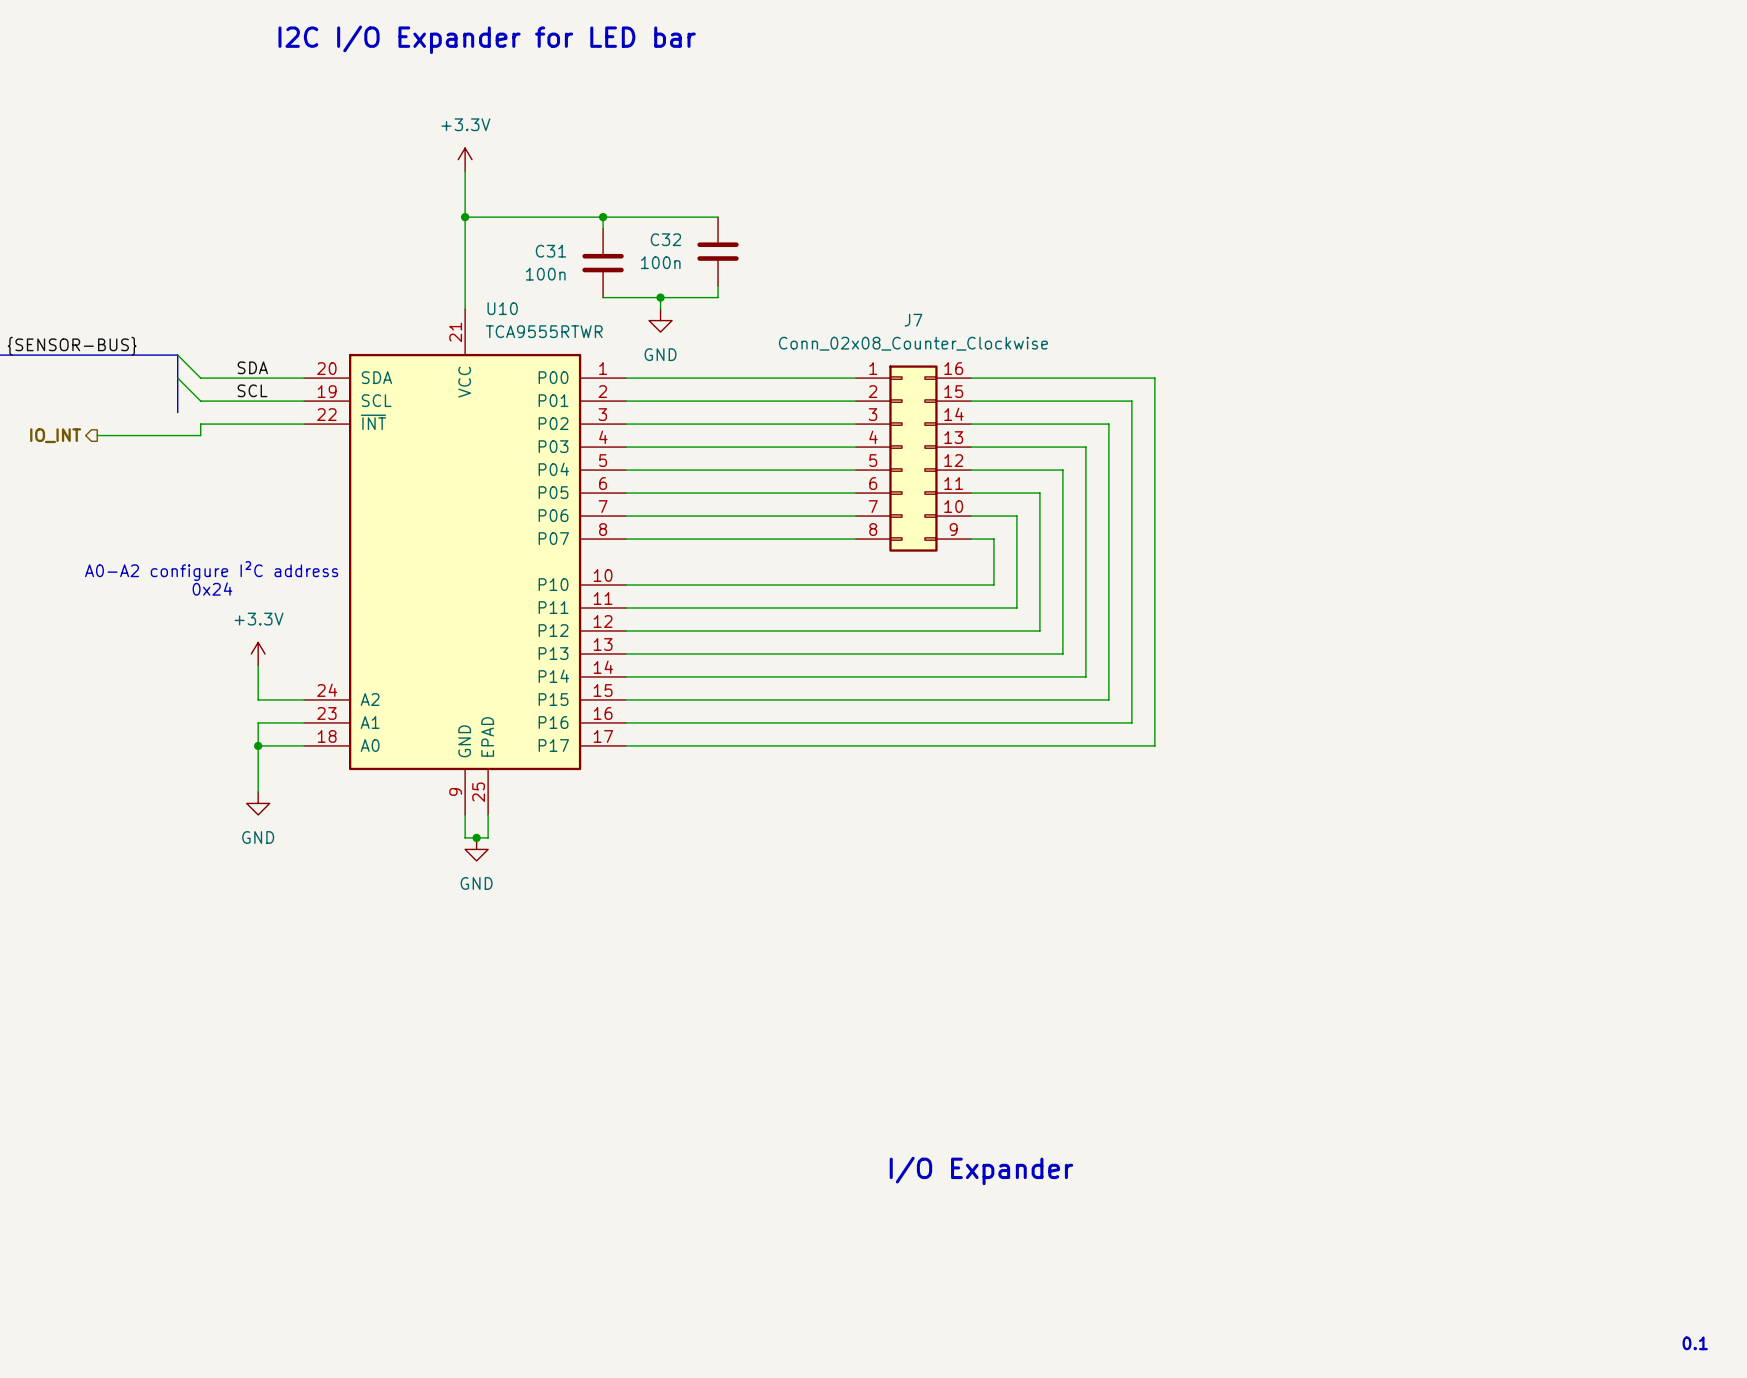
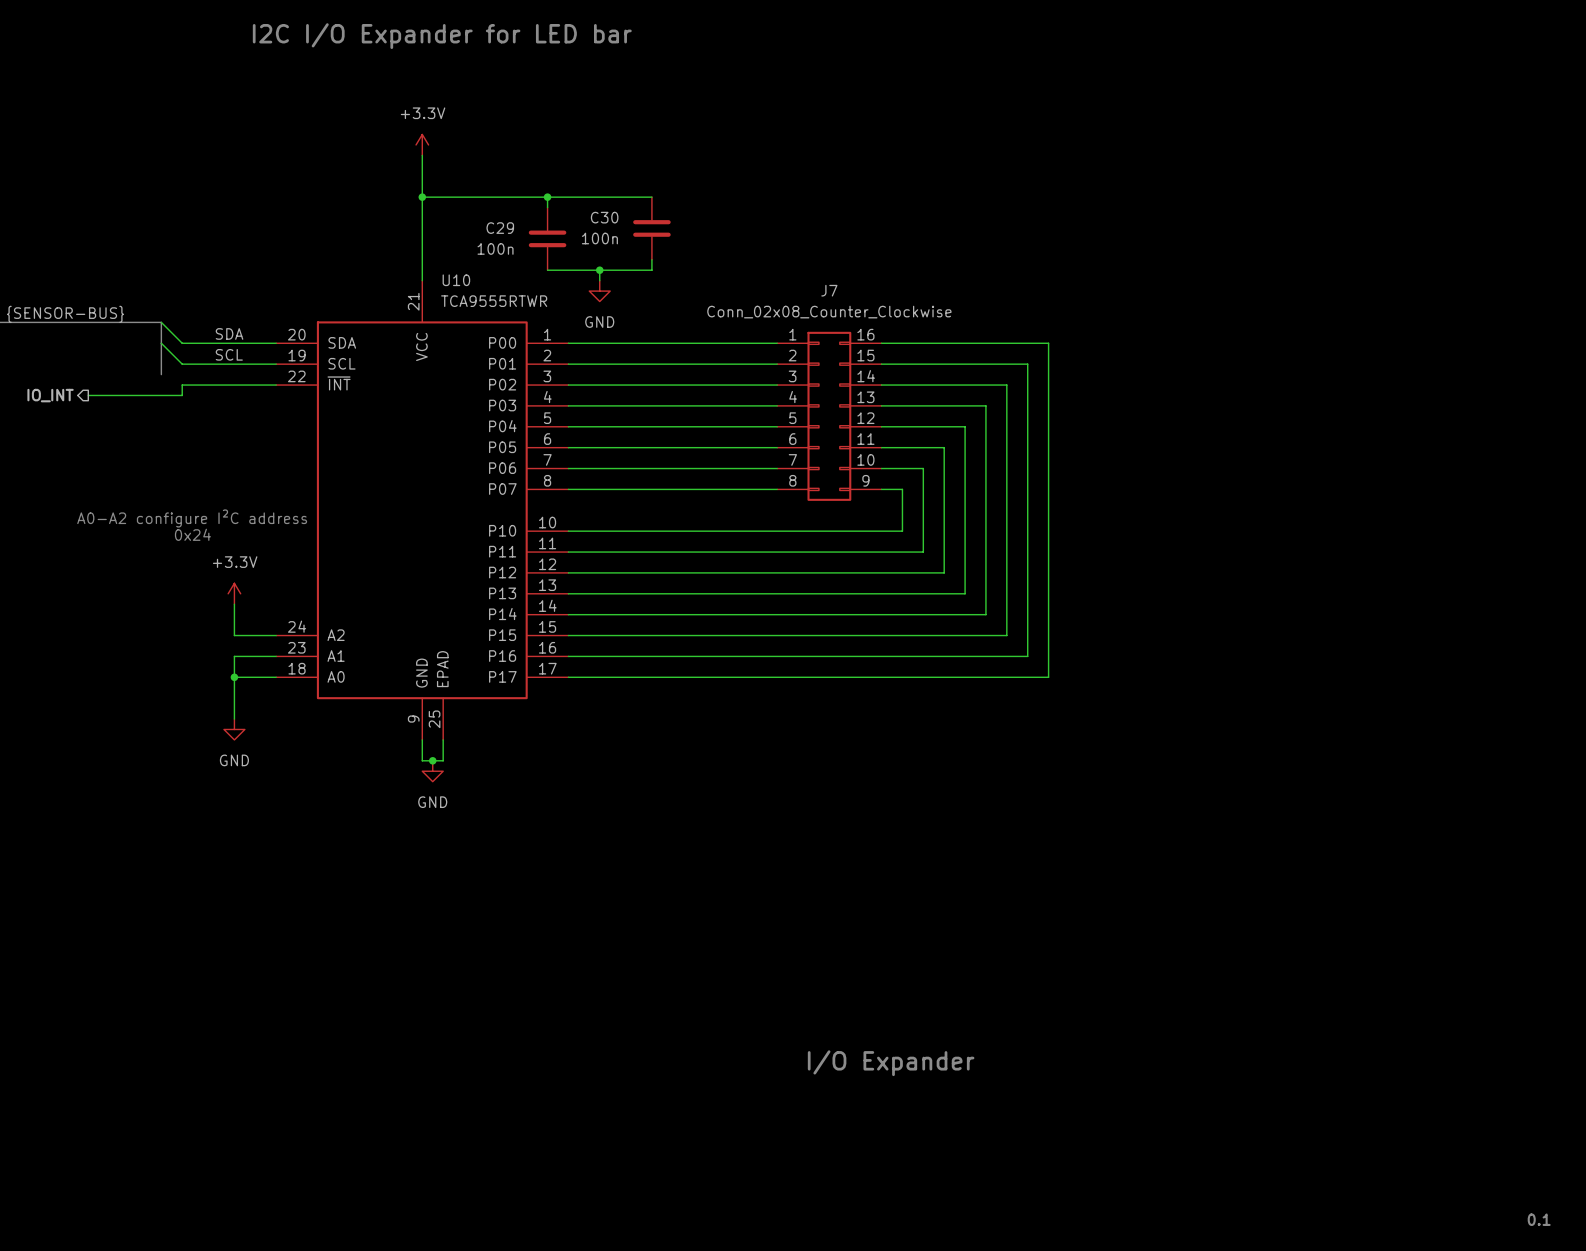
C32 name: C32 (665, 239) -> C30 (604, 217)
C31 name: C31 (550, 251) -> C29 (500, 228)

